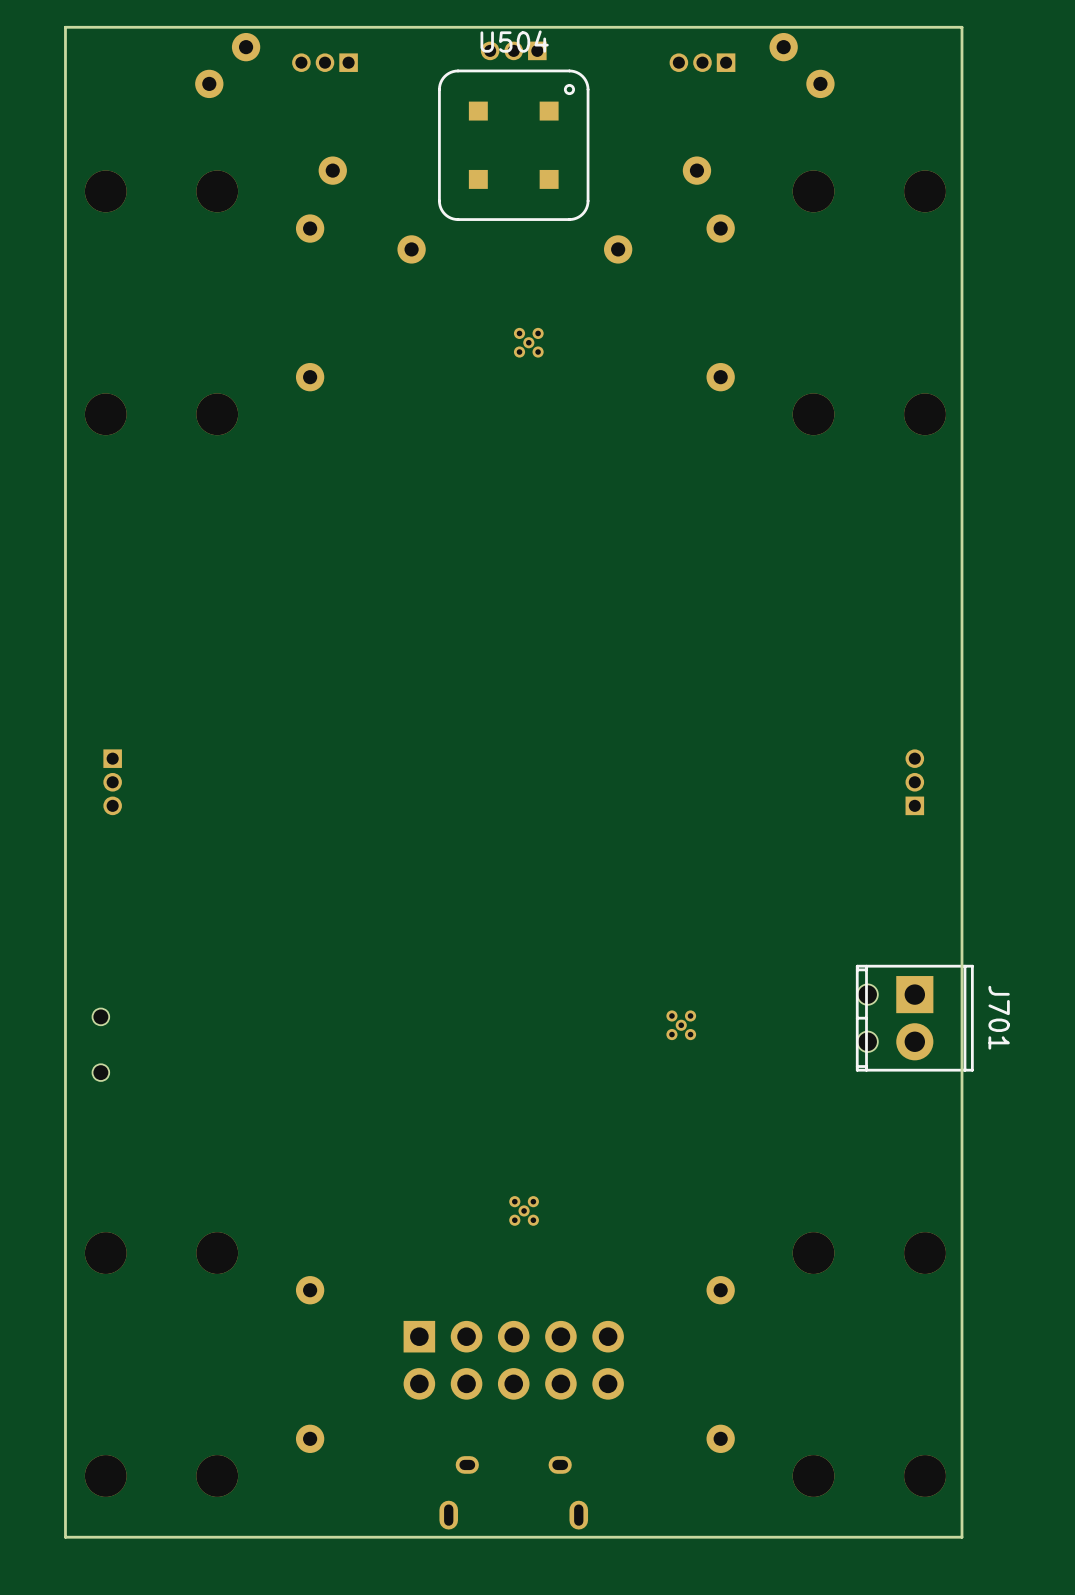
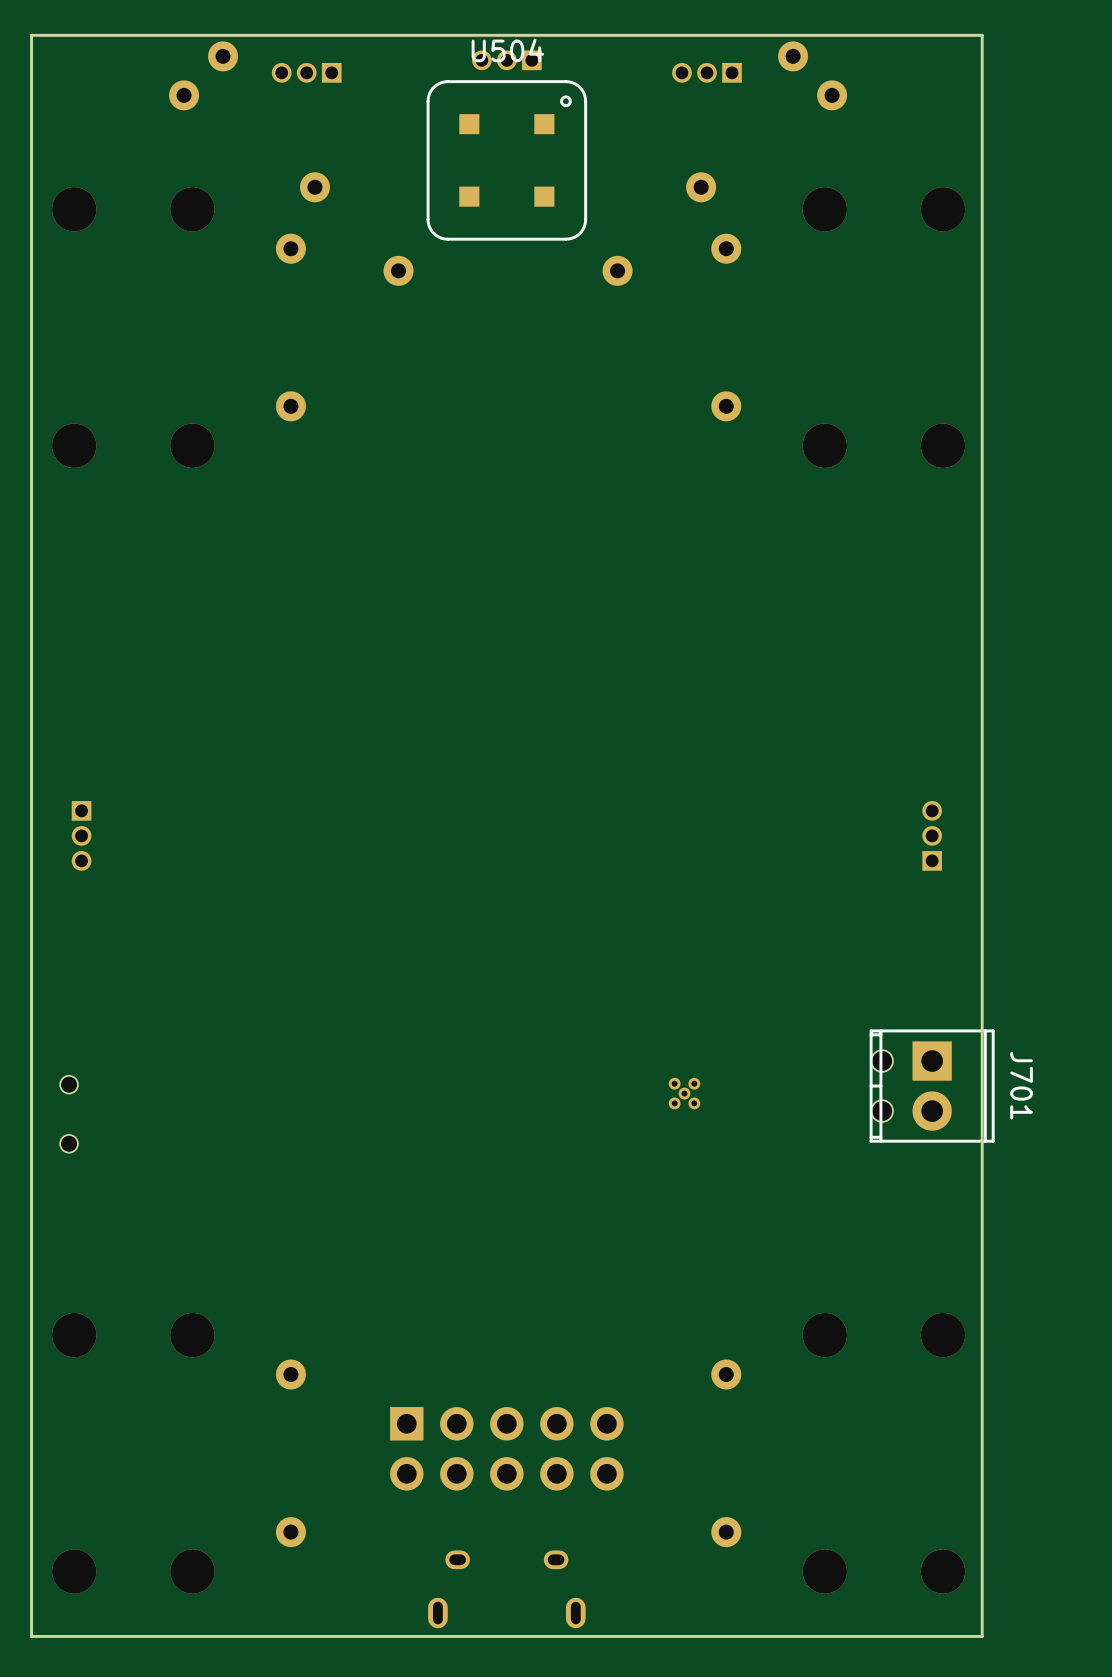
part: (528, 342) -> none
part: (524, 1210) -> none

